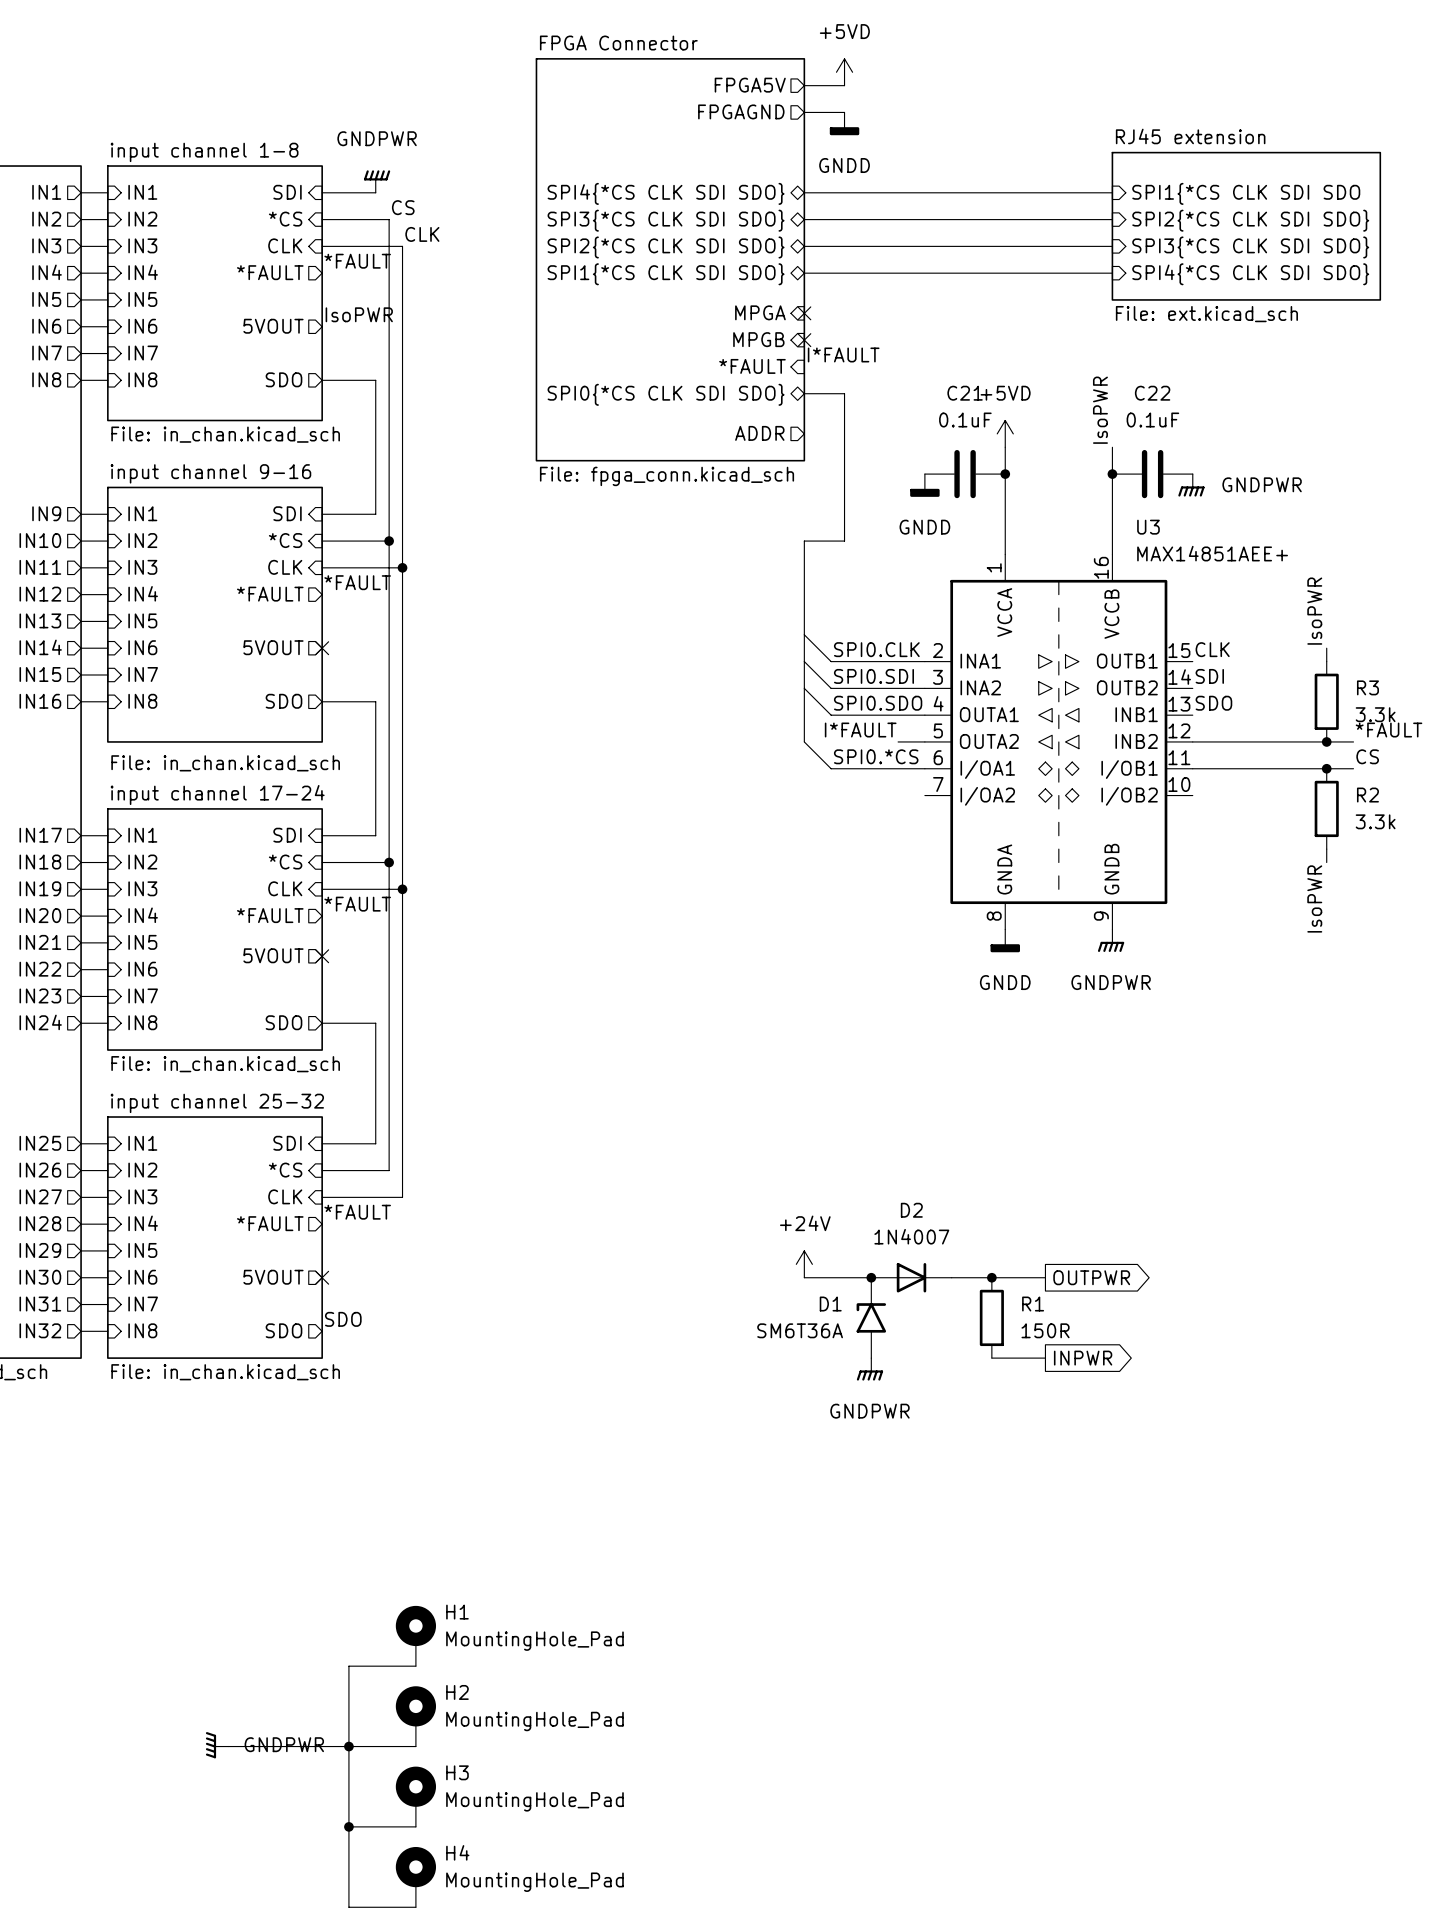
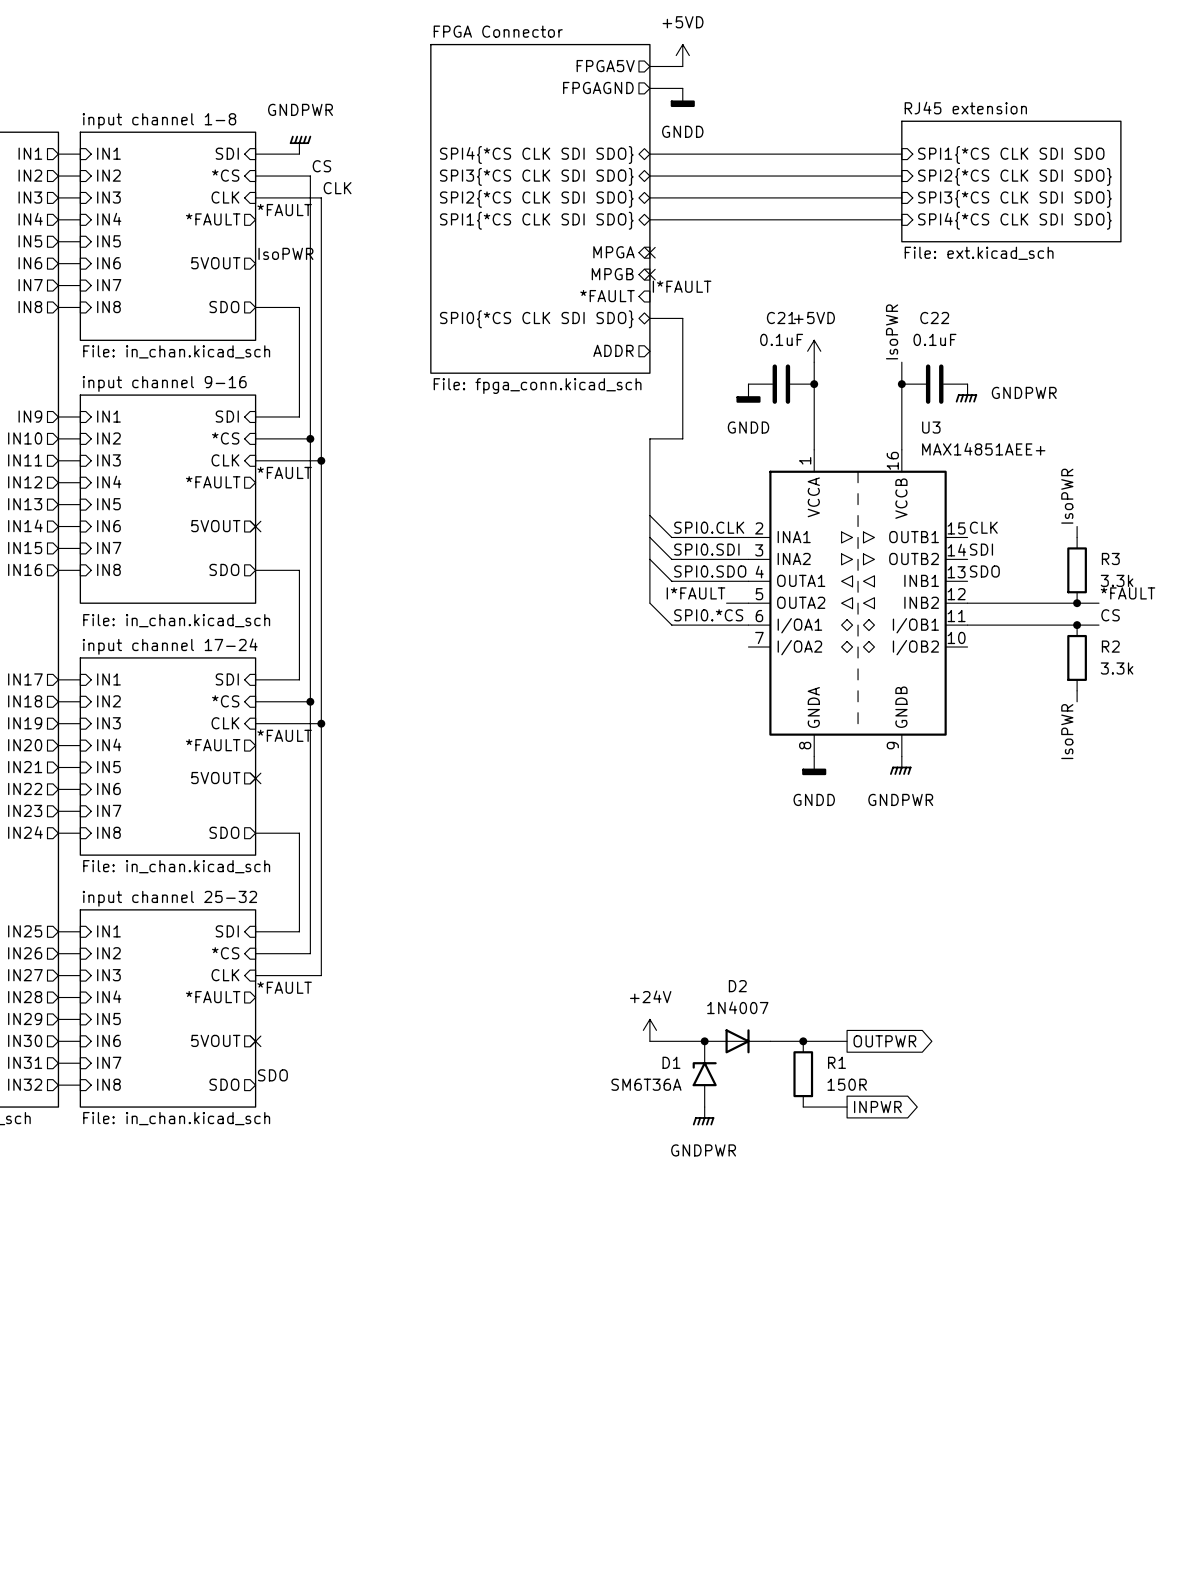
H1: MountingHole_Pad (415, 1636) -> none
wire: (415, 1666) (348, 1666) (348, 1907) (415, 1907) -> none
H2: MountingHole_Pad (415, 1716) -> none
power symbol: GNDPWR (217, 1745) -> none
wire: (228, 1746) (415, 1746) -> none
junction: (348, 1746) -> none
H3: MountingHole_Pad (415, 1796) -> none
wire: (348, 1826) (415, 1826) -> none
junction: (348, 1826) -> none
H4: MountingHole_Pad (415, 1877) -> none

